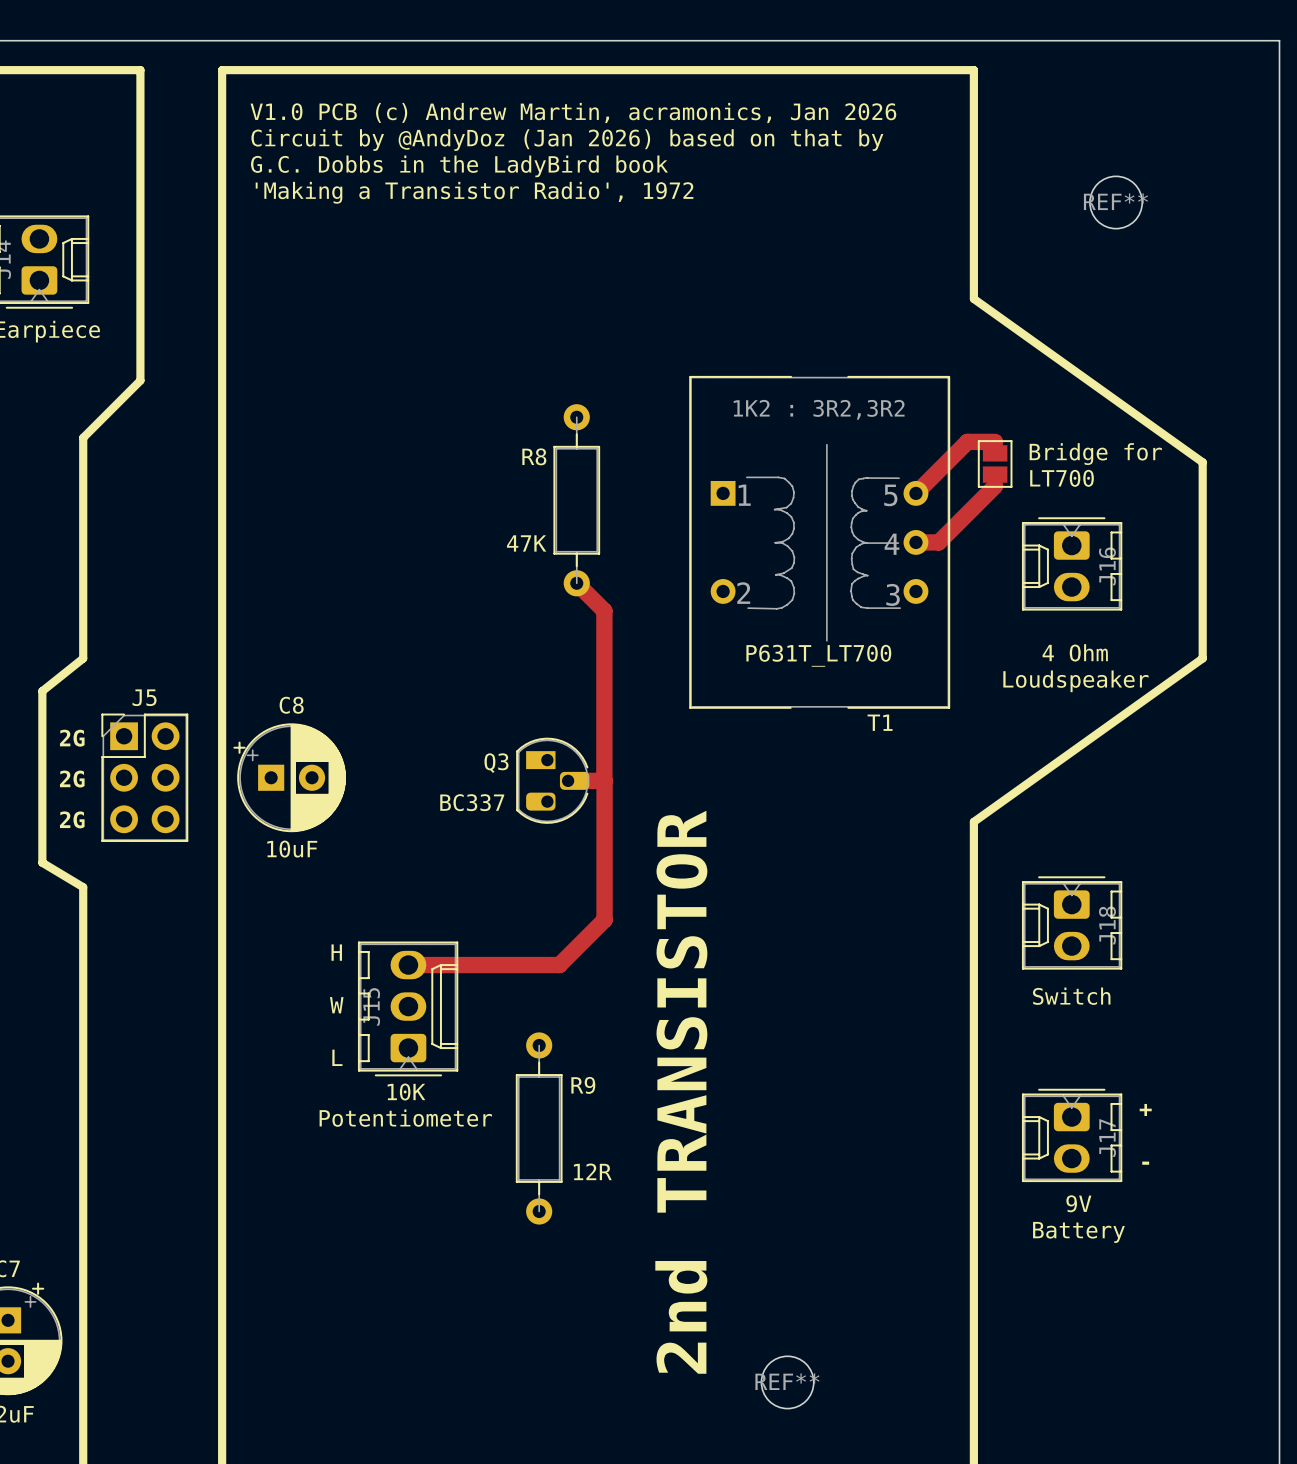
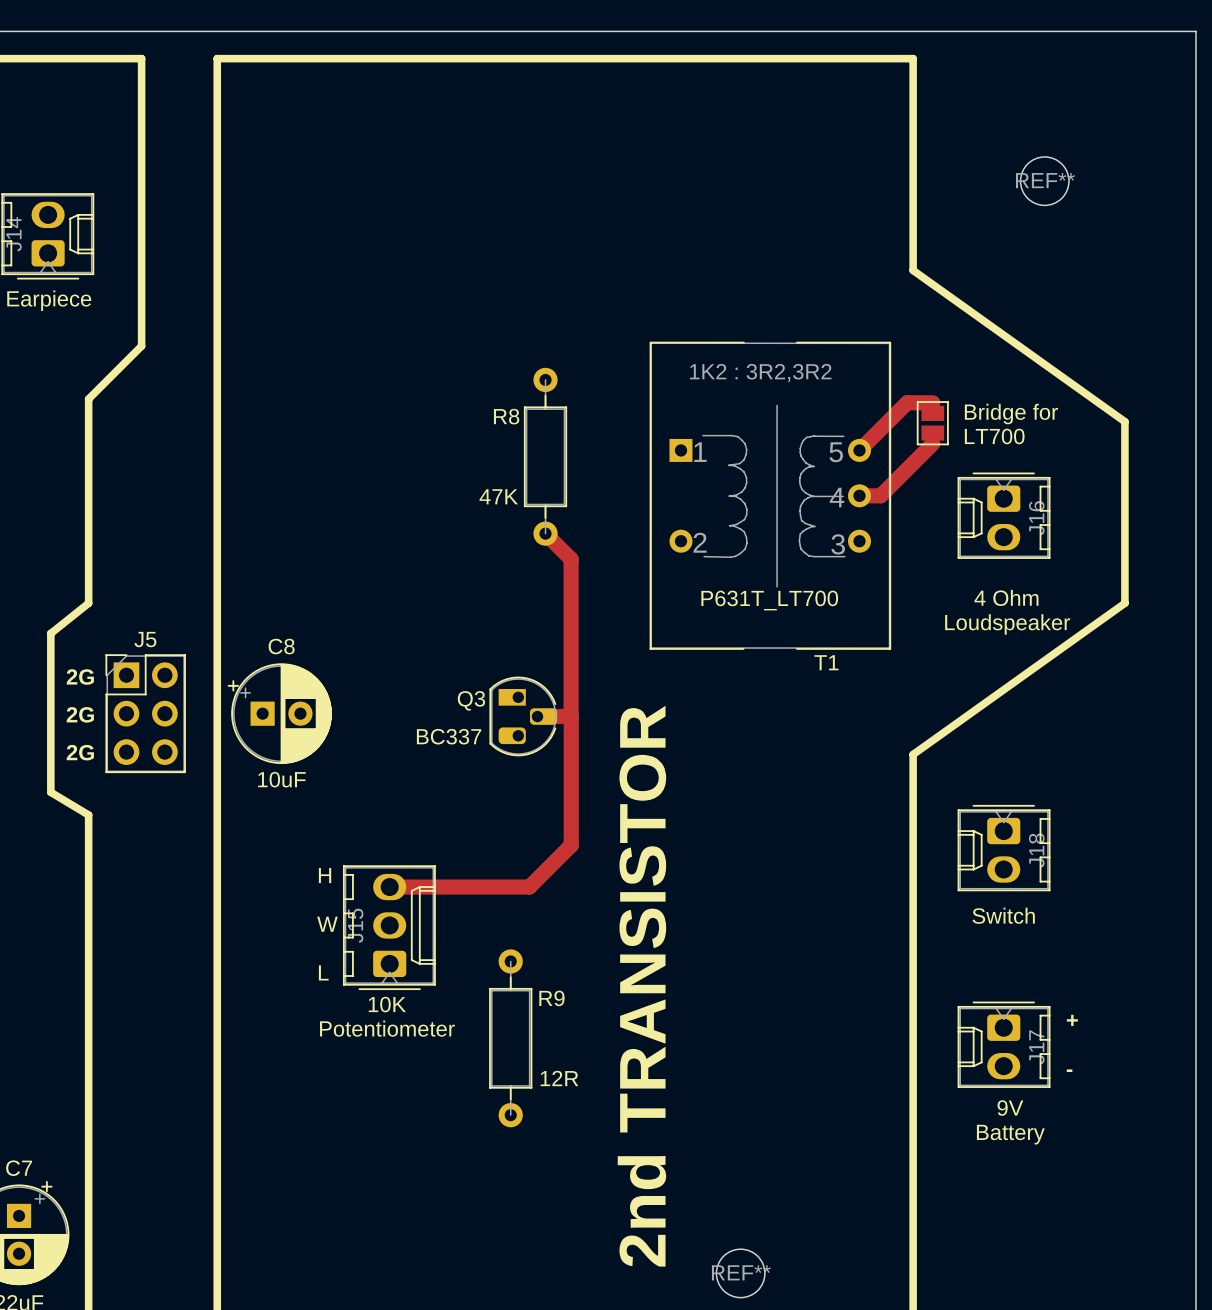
text: V1.0 PCB (c) Andrew Martin, acramonics, Jan 2026 (573, 112) -> none
text: Circuit by @AndyDoz (Jan 2026) based on that by (567, 140) -> none
text: G.C. Dobbs in the LadyBird book (459, 166) -> none
text: 'Making a Transistor Radio', 1972 (474, 192) -> none

